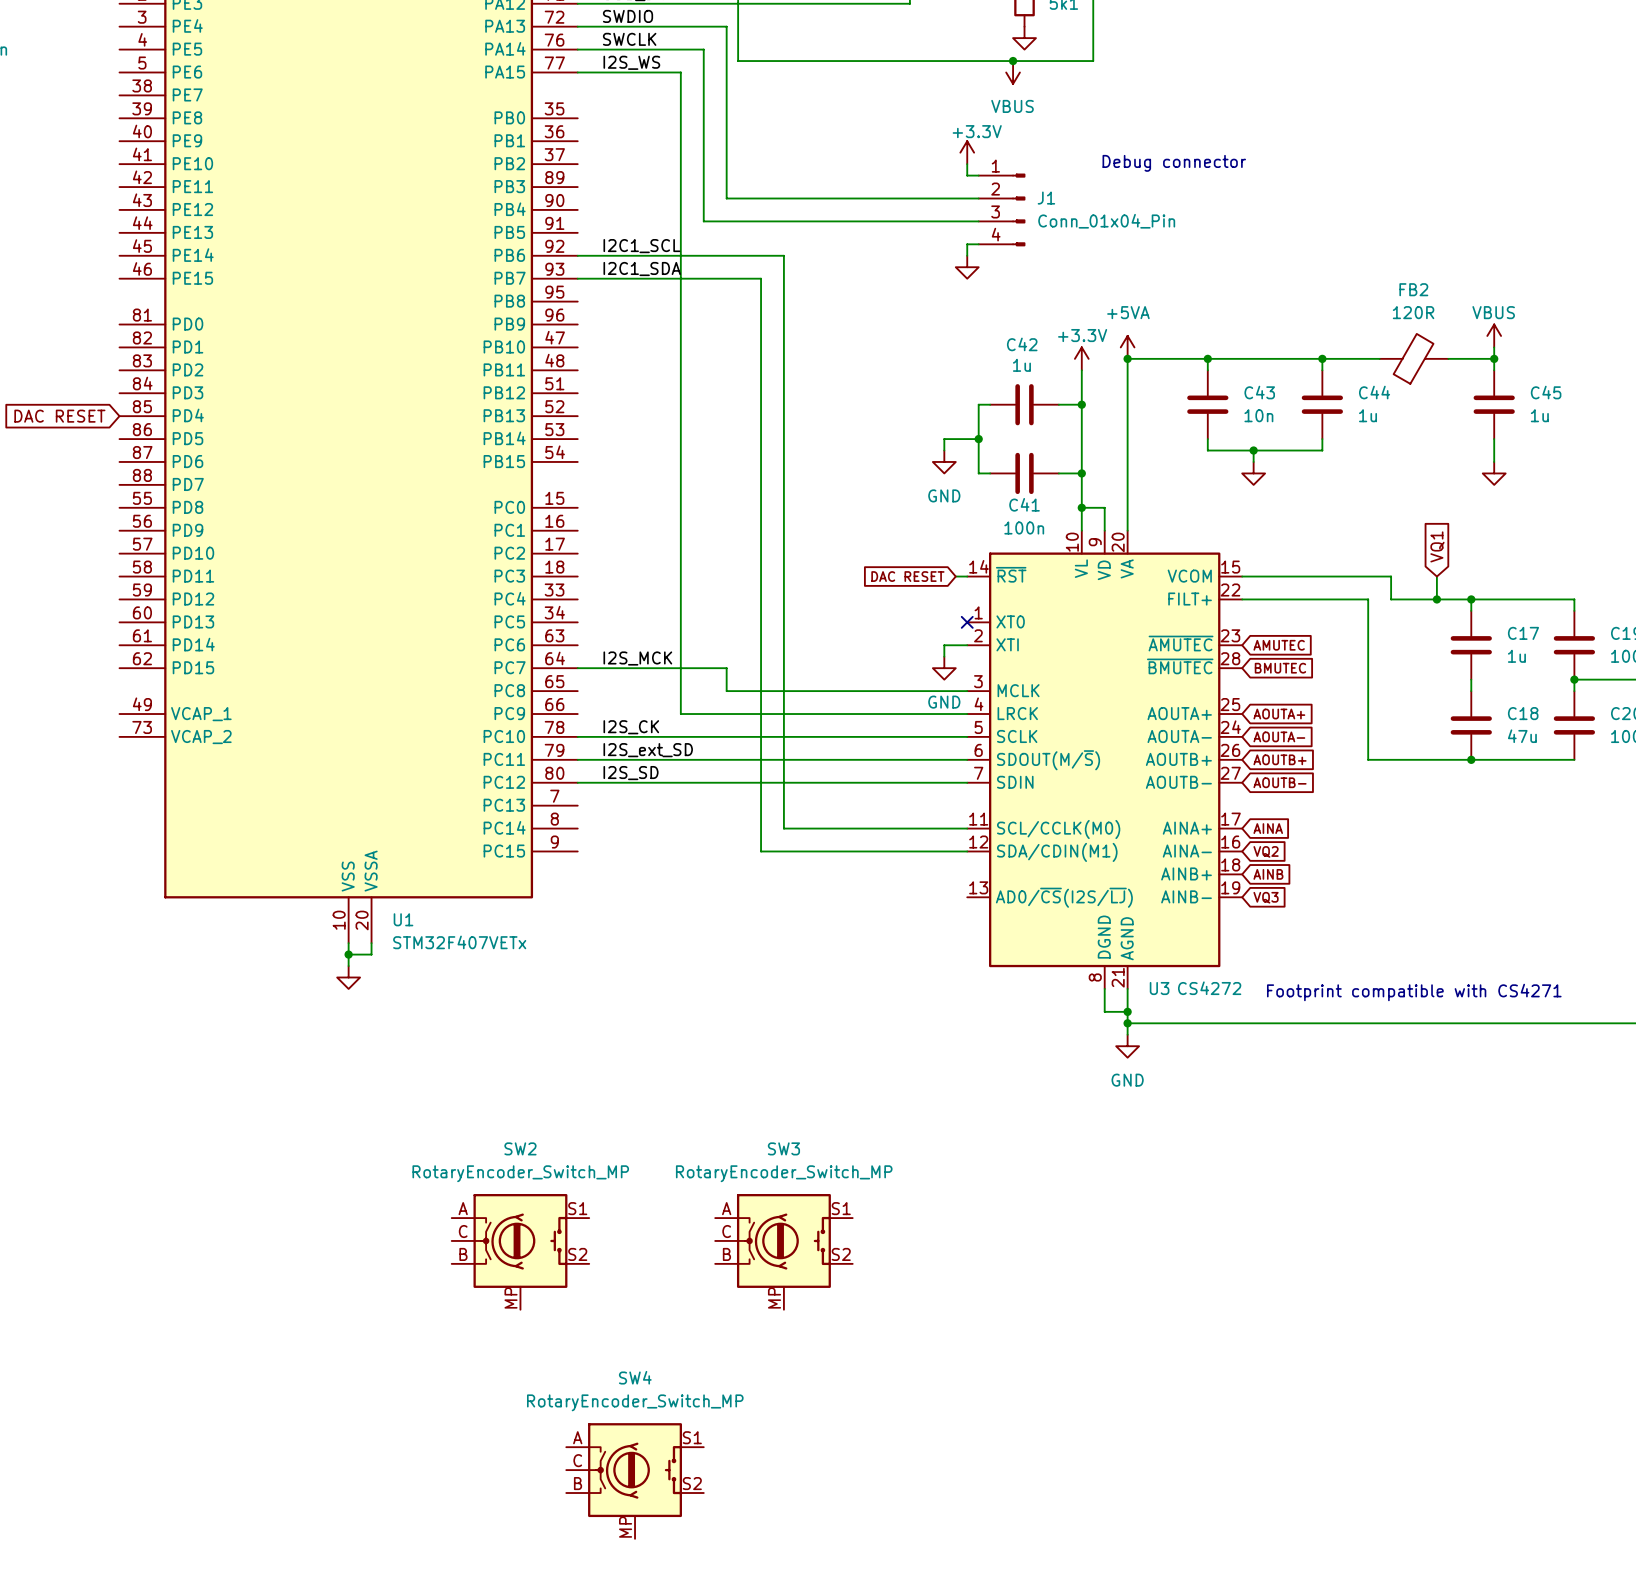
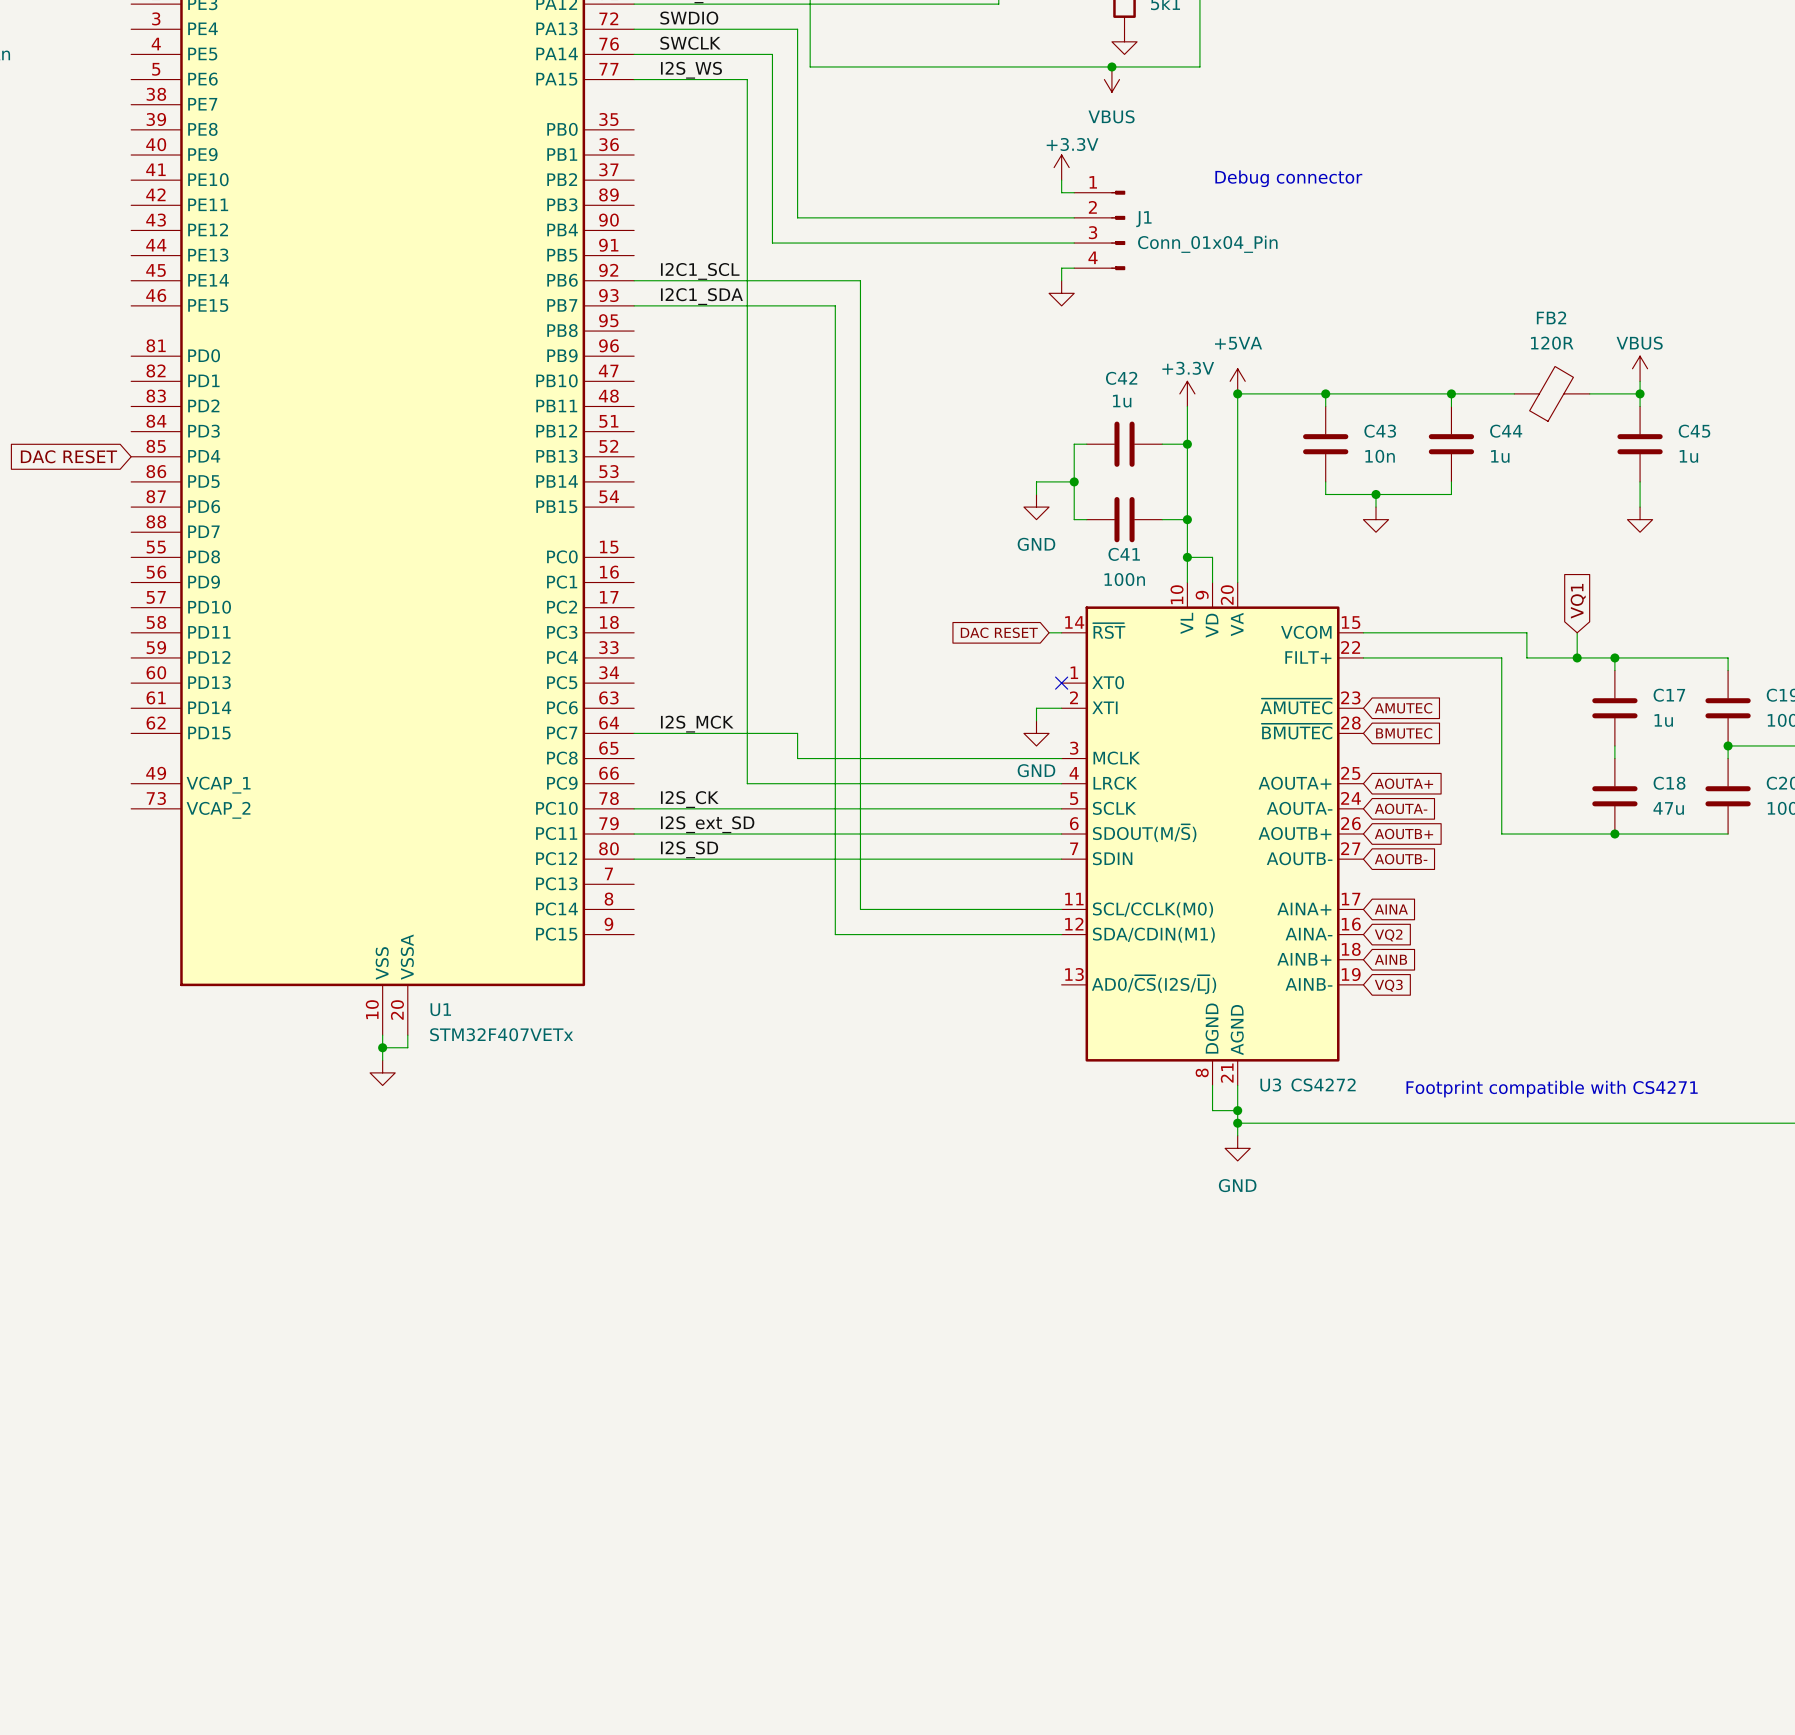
SW2: RotaryEncoder_Switch_MP (520, 1251) -> none
SW3: RotaryEncoder_Switch_MP (783, 1251) -> none
SW4: RotaryEncoder_Switch_MP (635, 1480) -> none

